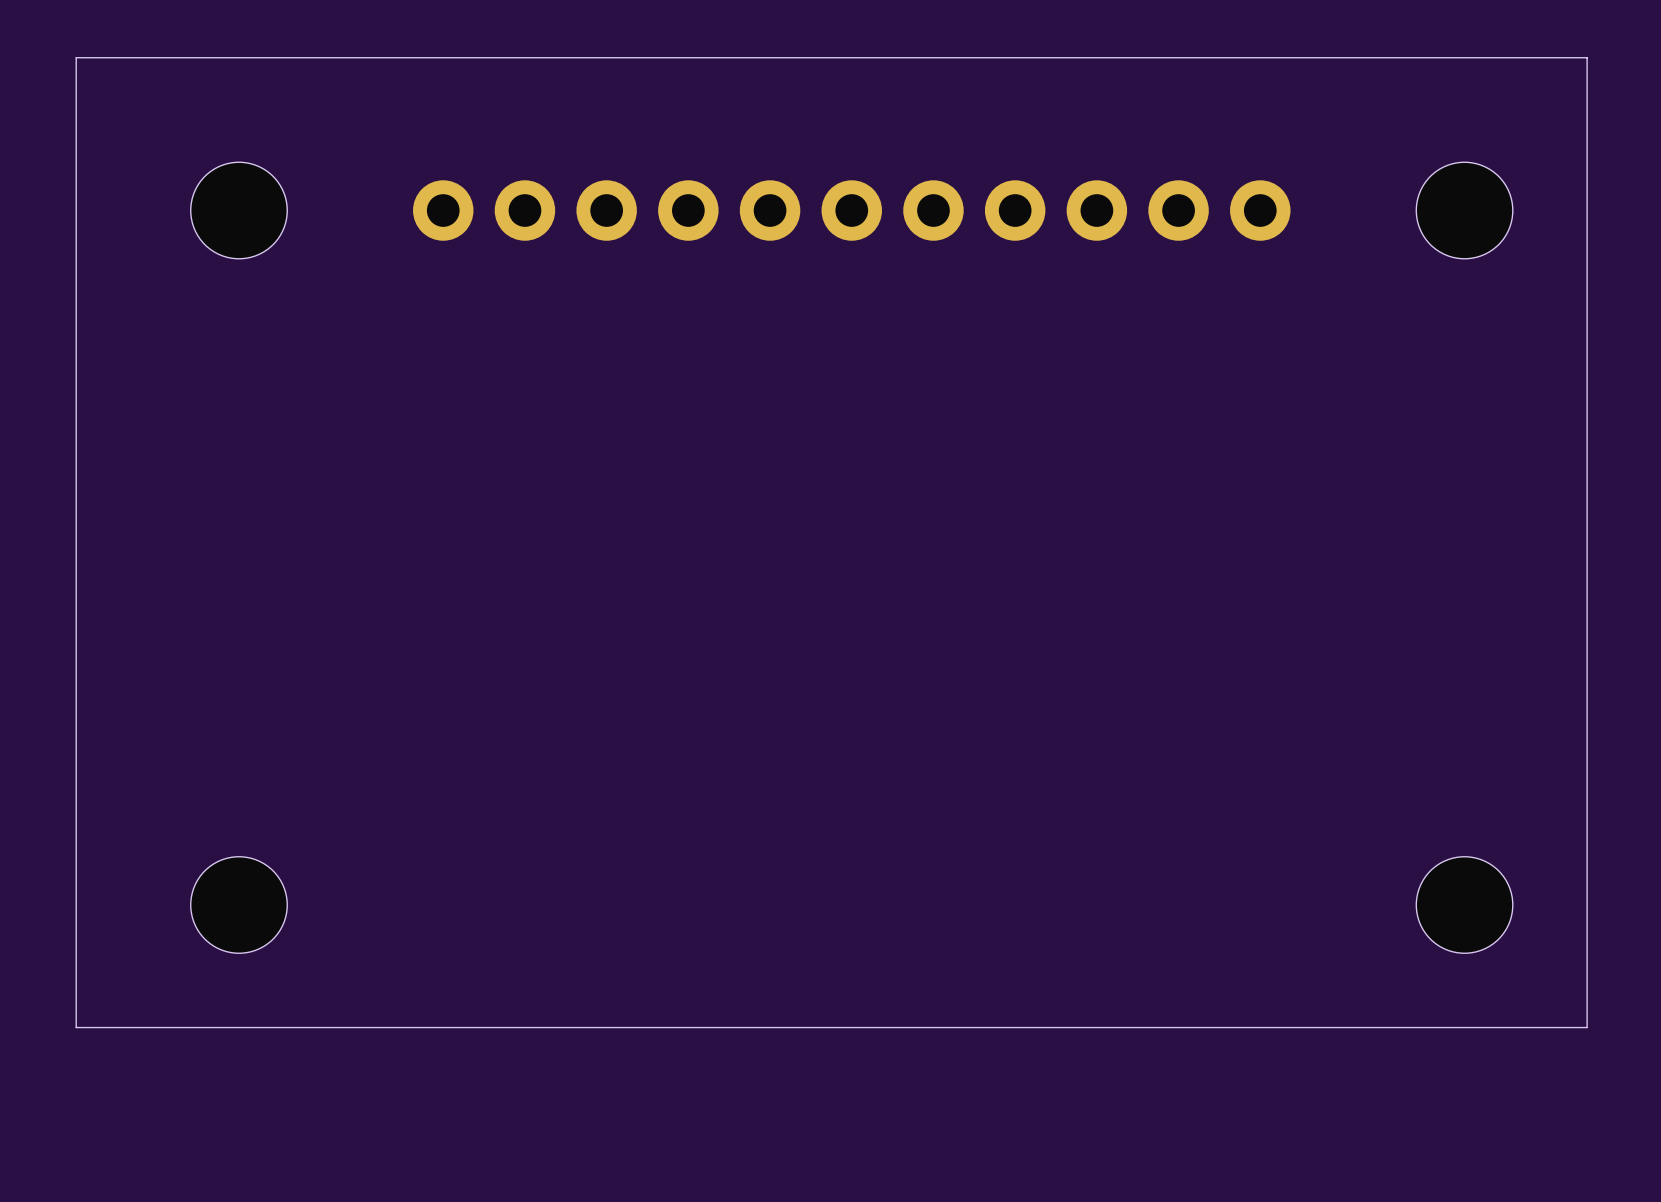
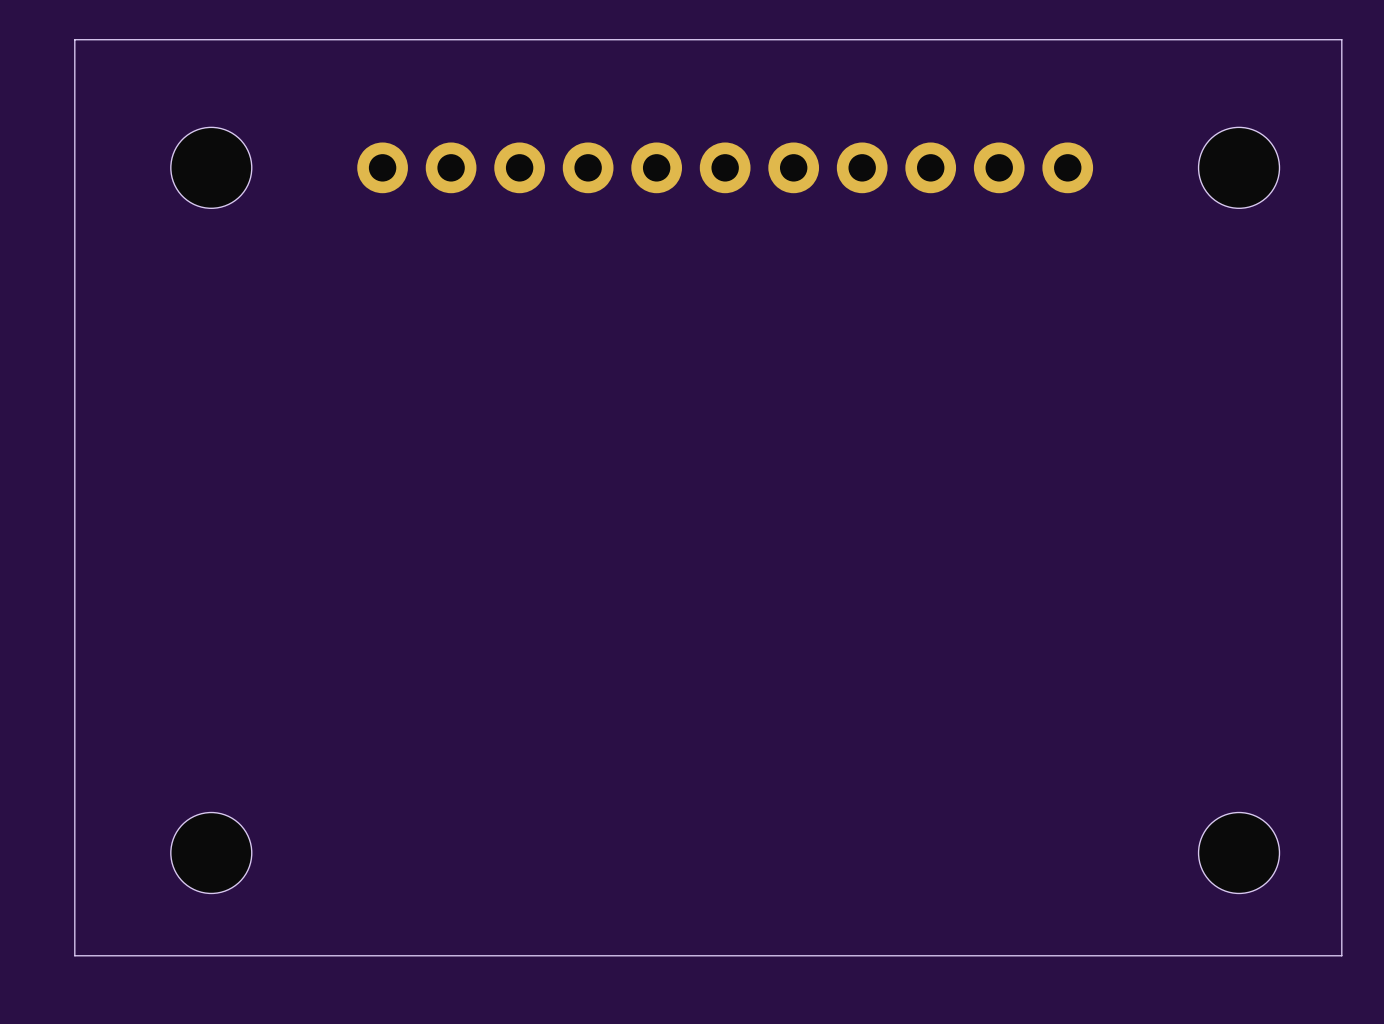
hole position: (238, 905) -> (211, 852)
hole position: (1464, 905) -> (1239, 852)
board edge: (1587, 1027) (76, 1027) -> (1341, 852) (1341, 955) (74, 955) (74, 852)

